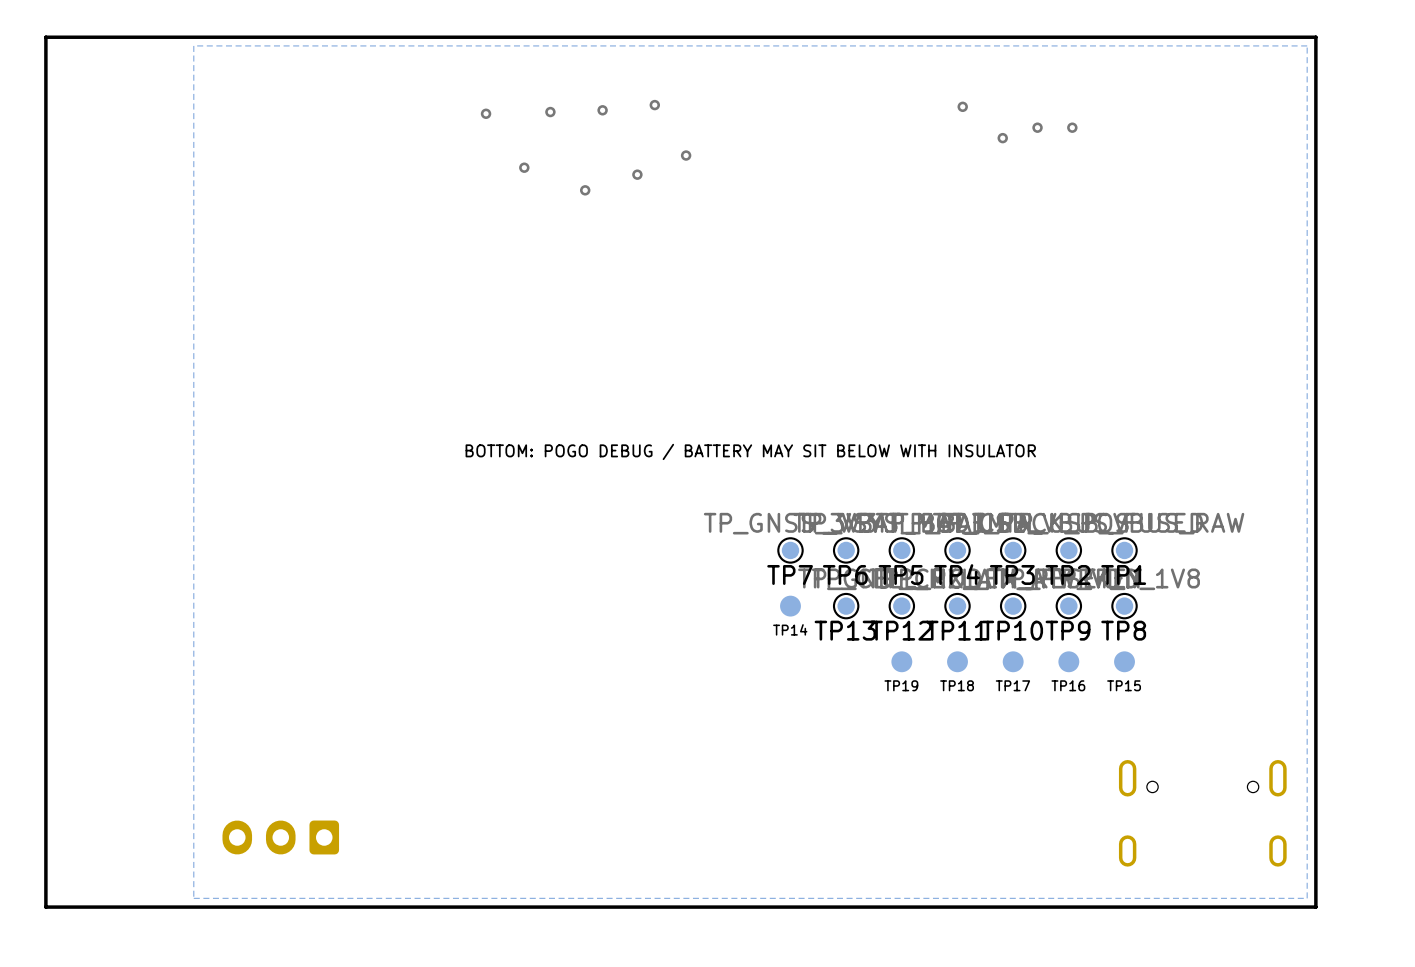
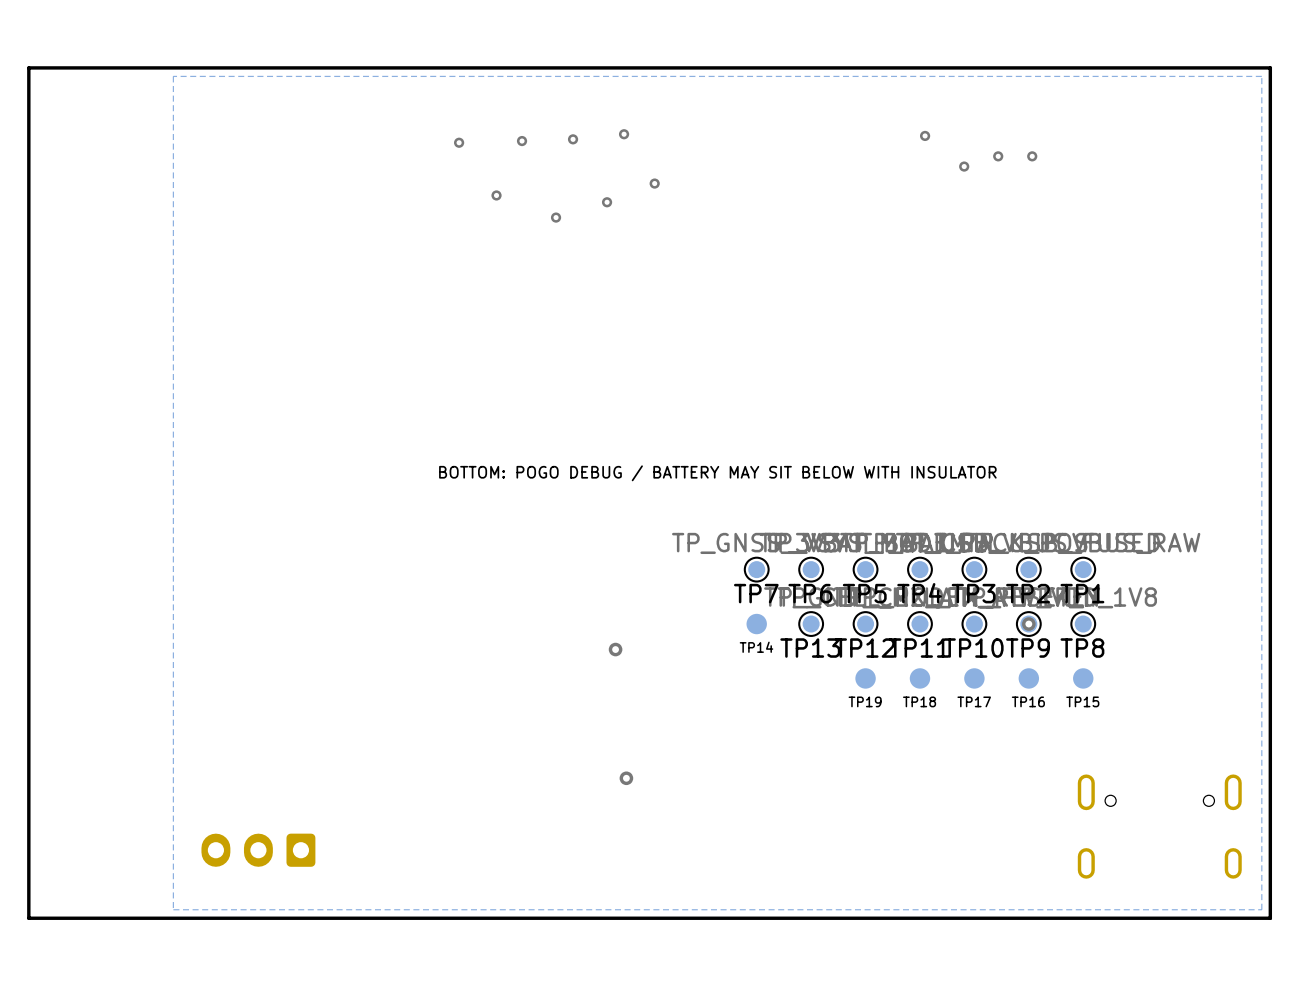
via: none -> (1028, 624)
via: none -> (615, 649)
via: none -> (626, 778)

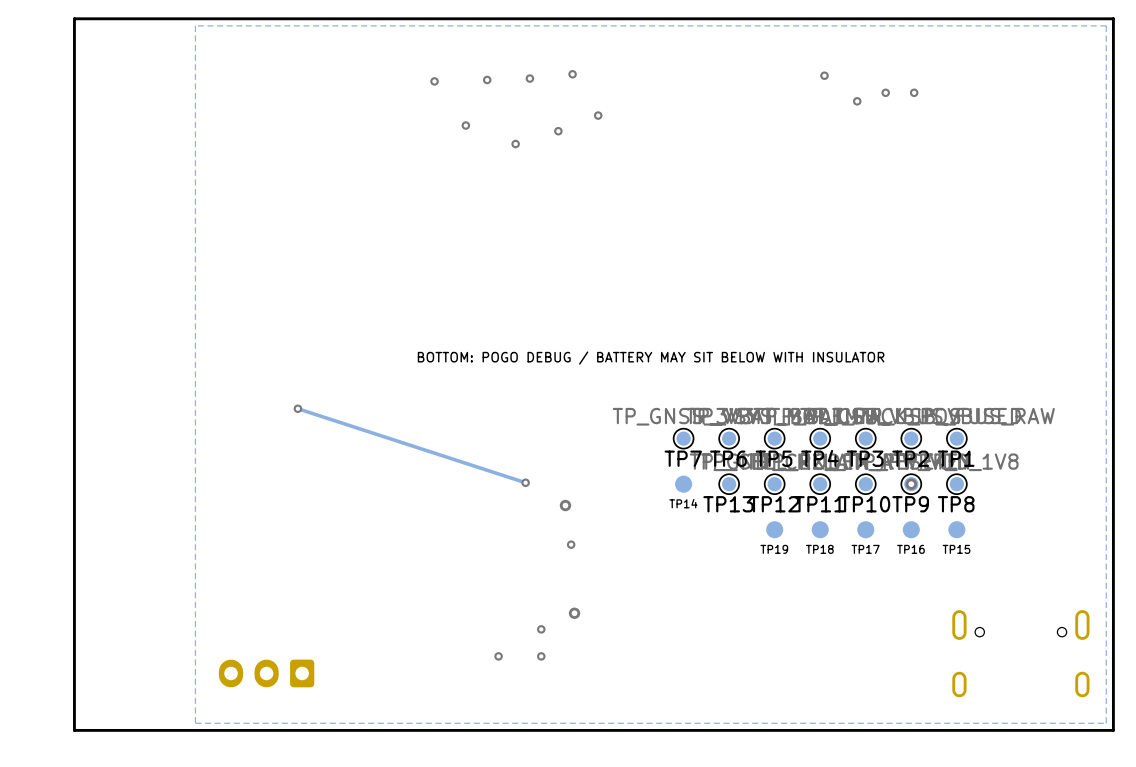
track: none -> (297, 408) (525, 482)
via: none -> (297, 408)
via: none -> (525, 482)
via: none -> (571, 544)
via: none -> (541, 629)
via: none -> (498, 656)
via: none -> (541, 656)

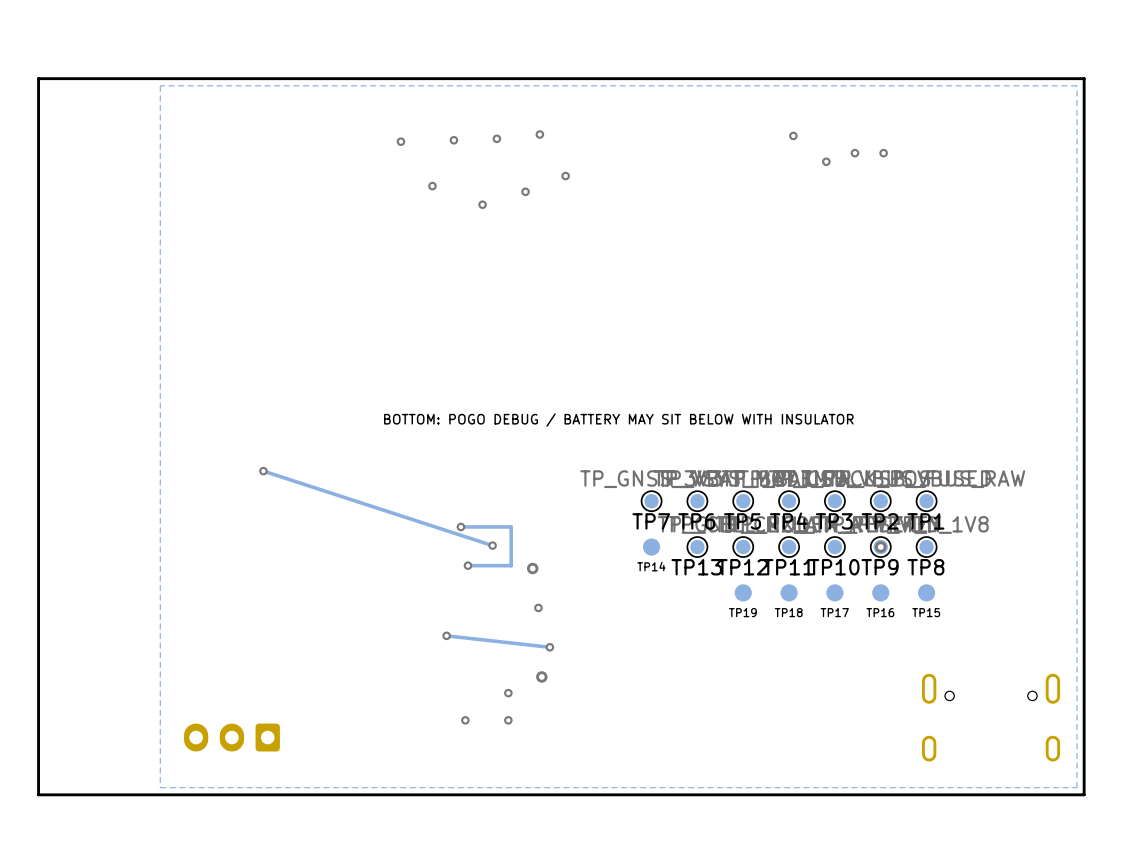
track: none -> (460, 526) (511, 526) (511, 565) (467, 565)
via: none -> (460, 526)
via: none -> (467, 565)
track: none -> (446, 635) (549, 647)
via: none -> (446, 635)
via: none -> (549, 647)

